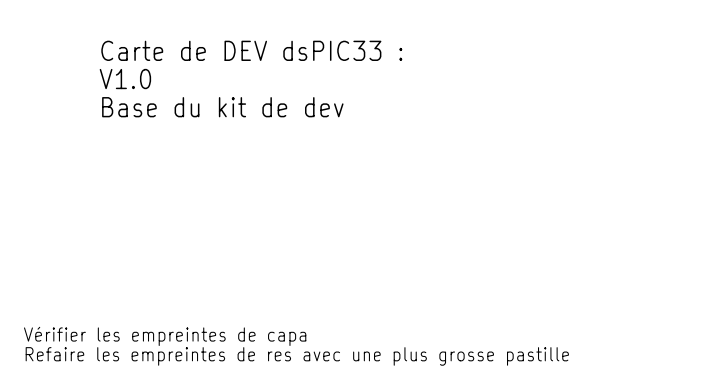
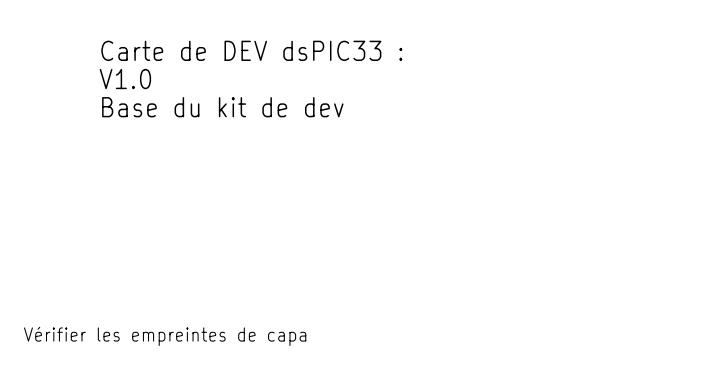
text: Refaire les empreintes de res avec une plus grosse pastille (297, 356) -> none

